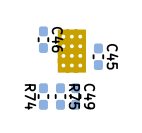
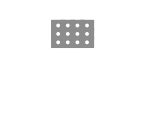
C46: (43, 39) -> none
part rotation: 0° (71, 51) -> 90° clockwise (72, 33)
C45: (98, 56) -> none
R74: (43, 96) -> none
R75: (60, 96) -> none
C49: (75, 96) -> none

